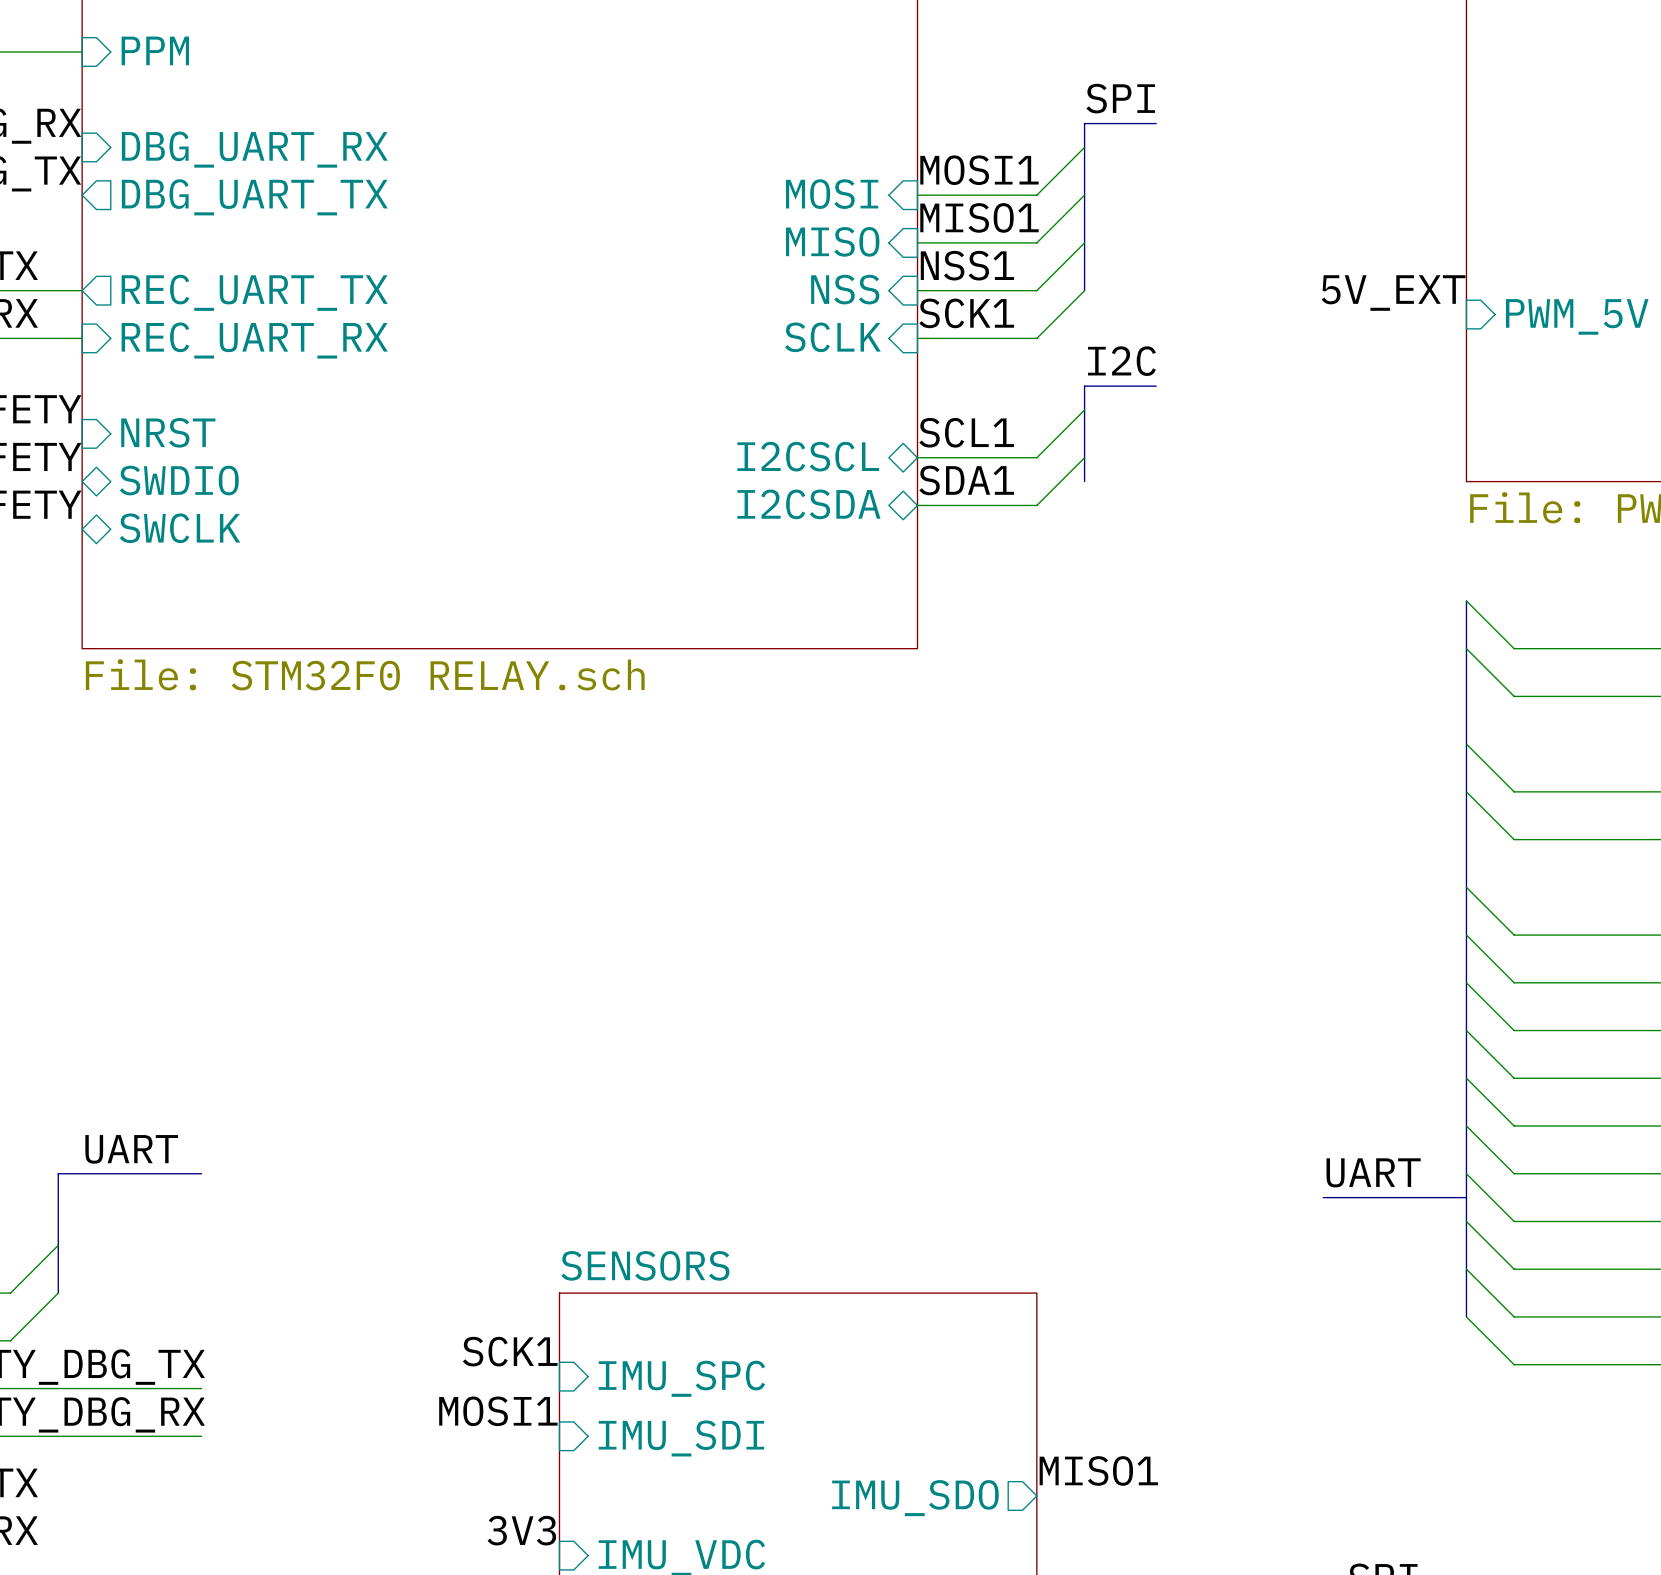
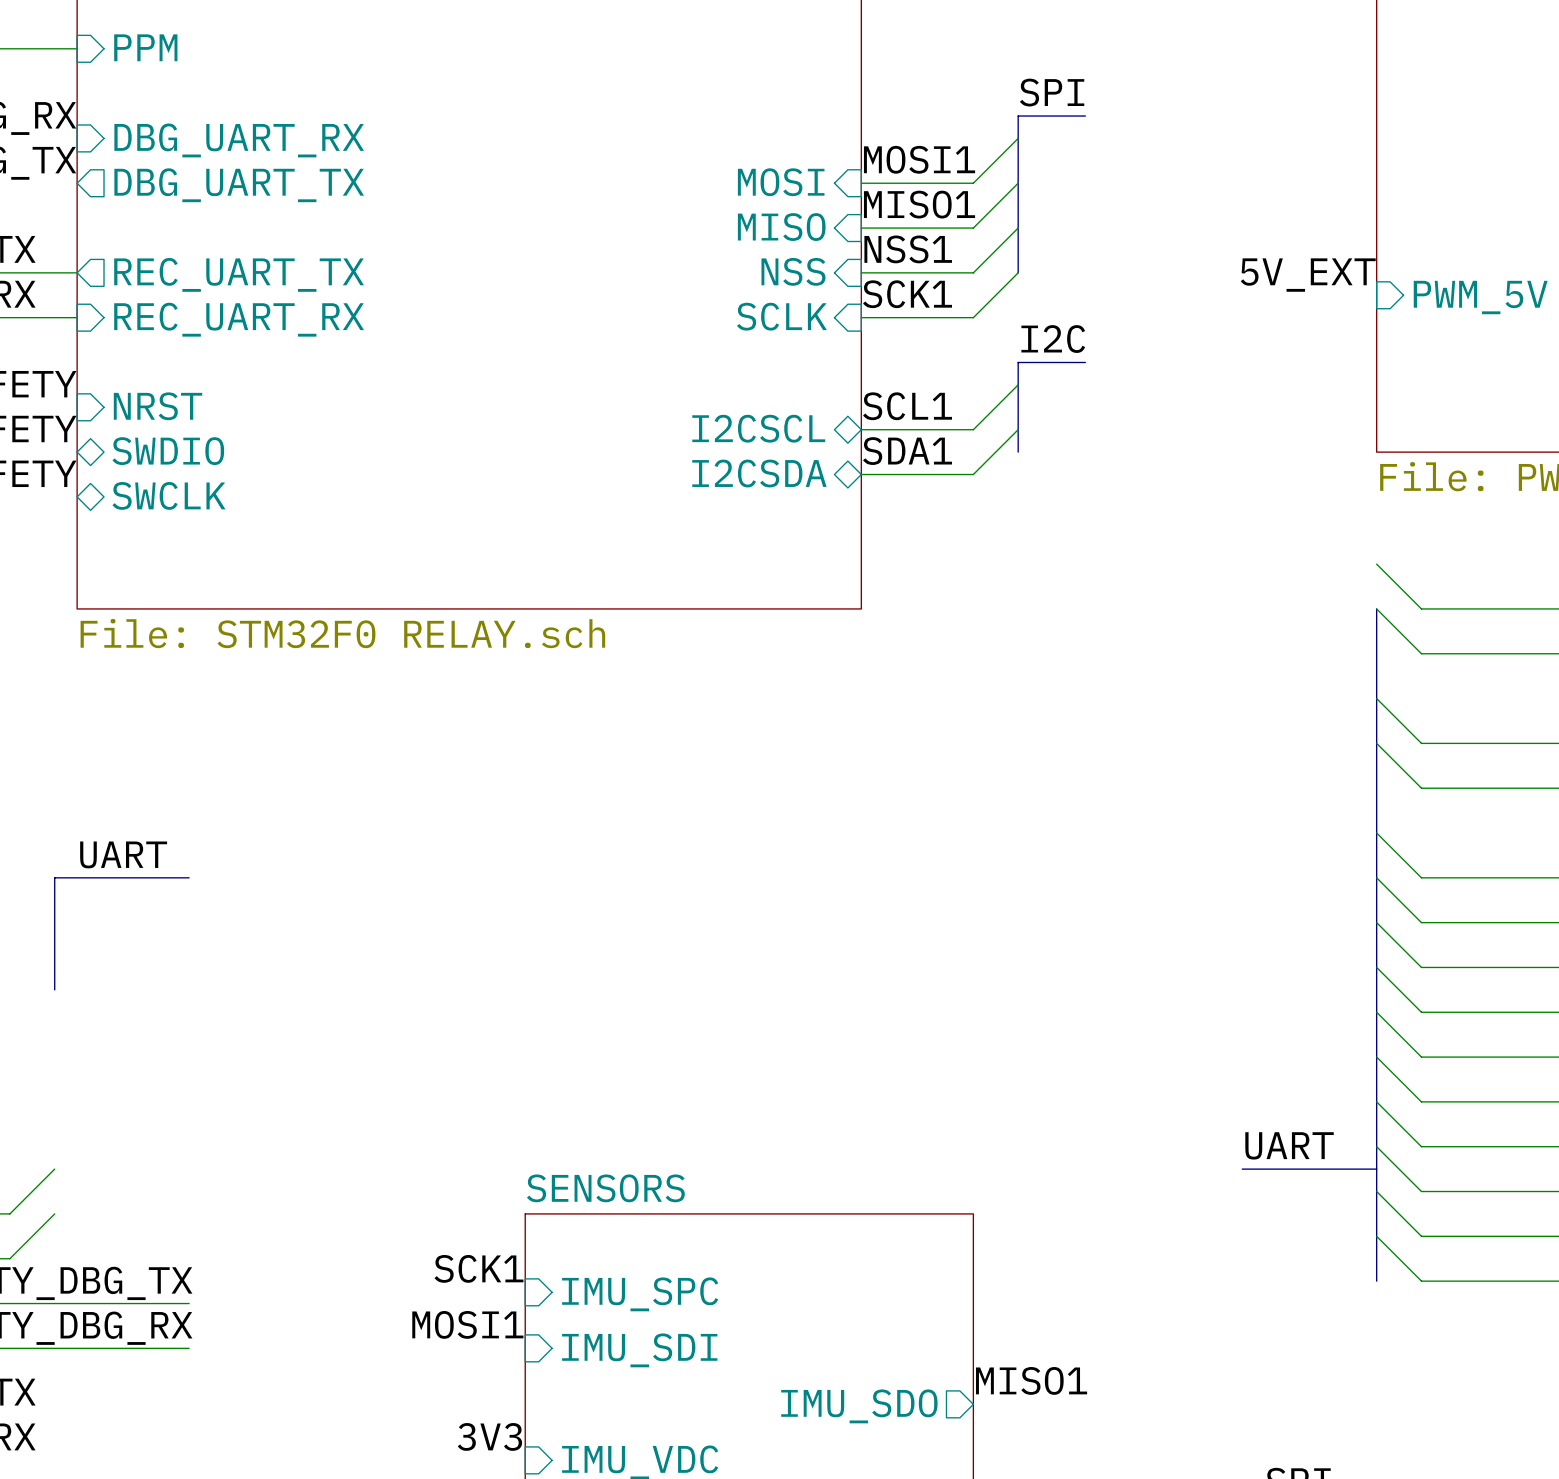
bus: (1466, 600) (1466, 648) -> none
label position: UART (131, 1149) -> UART (123, 854)
label position: UART (1373, 1172) -> UART (1289, 1145)
bus: (201, 1173) (58, 1173) (58, 1293) -> (189, 877) (54, 877) (54, 989)
bus: (1323, 1197) (1466, 1197) -> (1242, 1169) (1376, 1169)
bus: none -> (1376, 1236) (1376, 1281)

